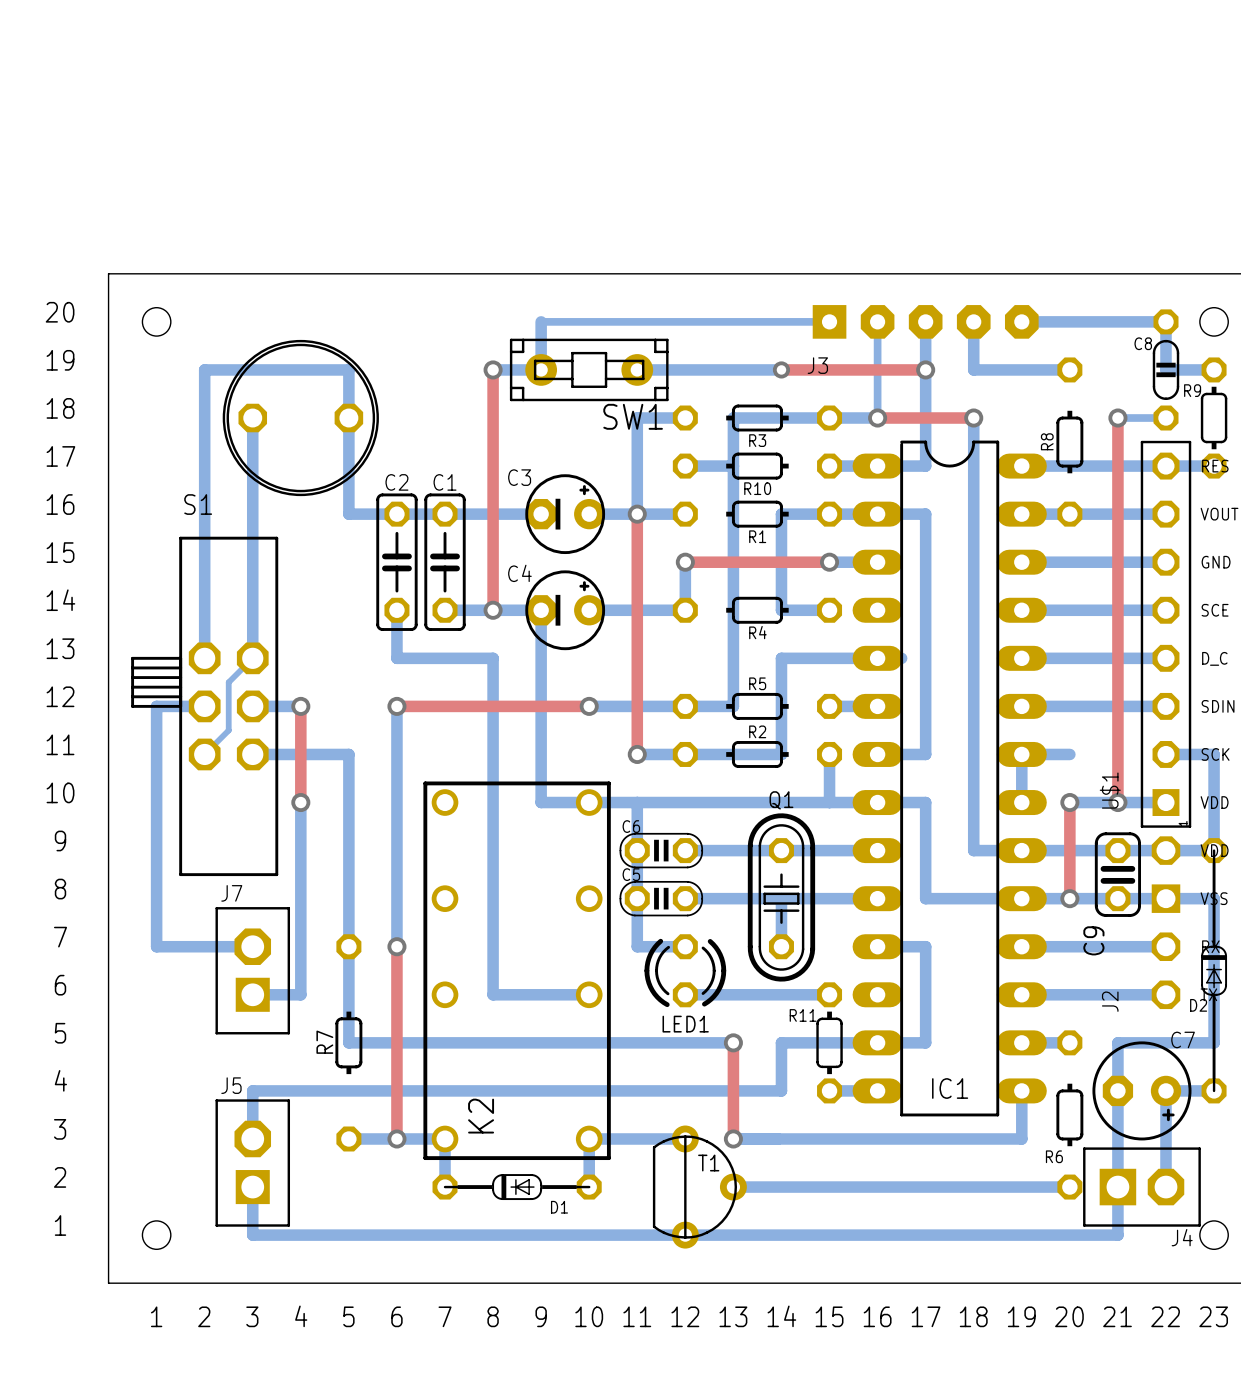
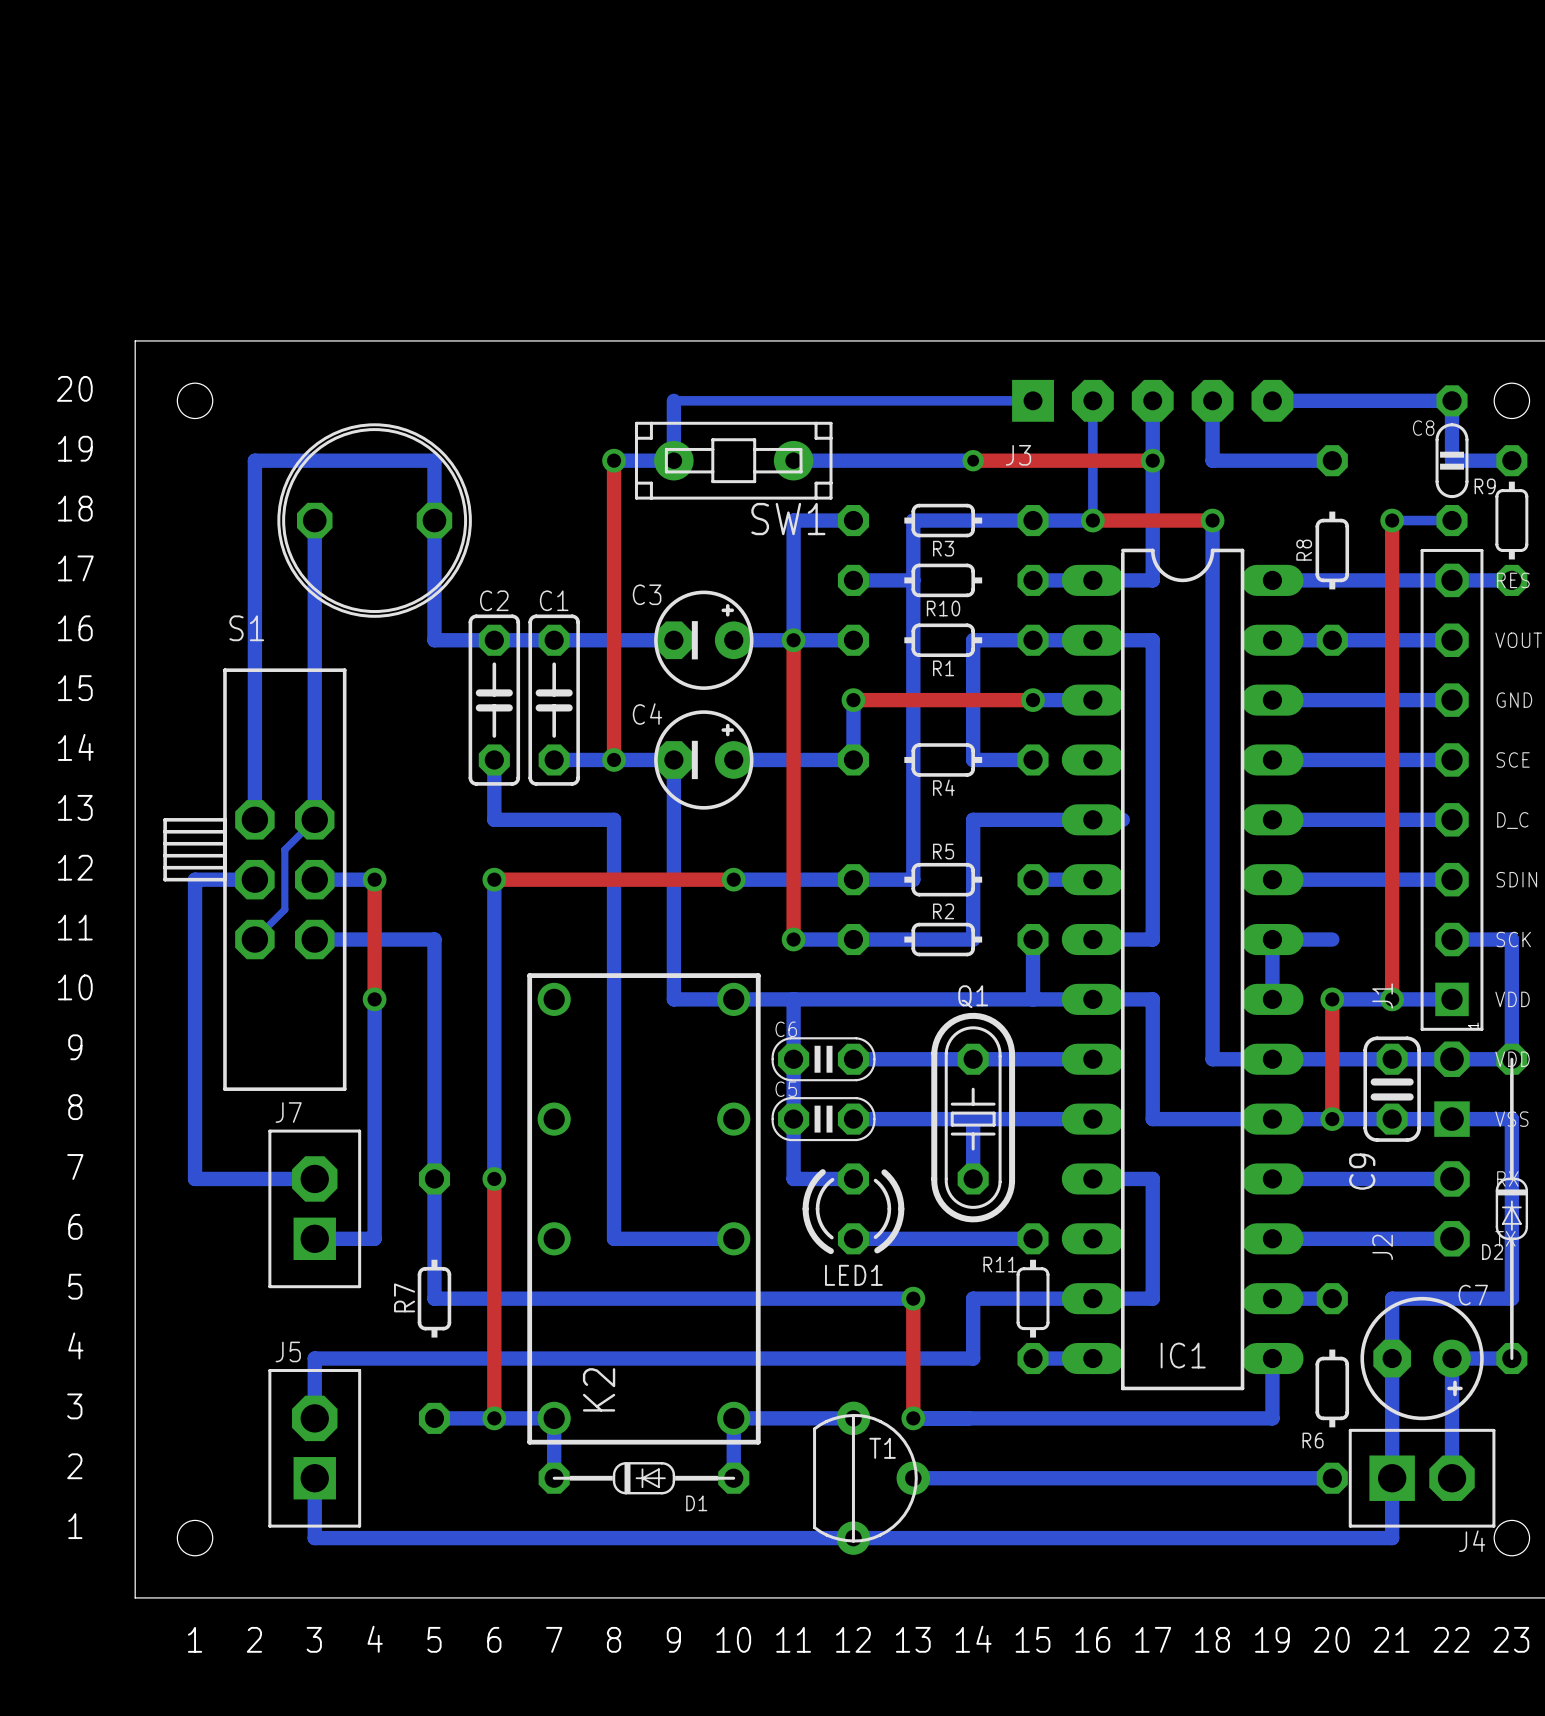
U$1 name: U$1 (1110, 790) -> J1 (1382, 995)

